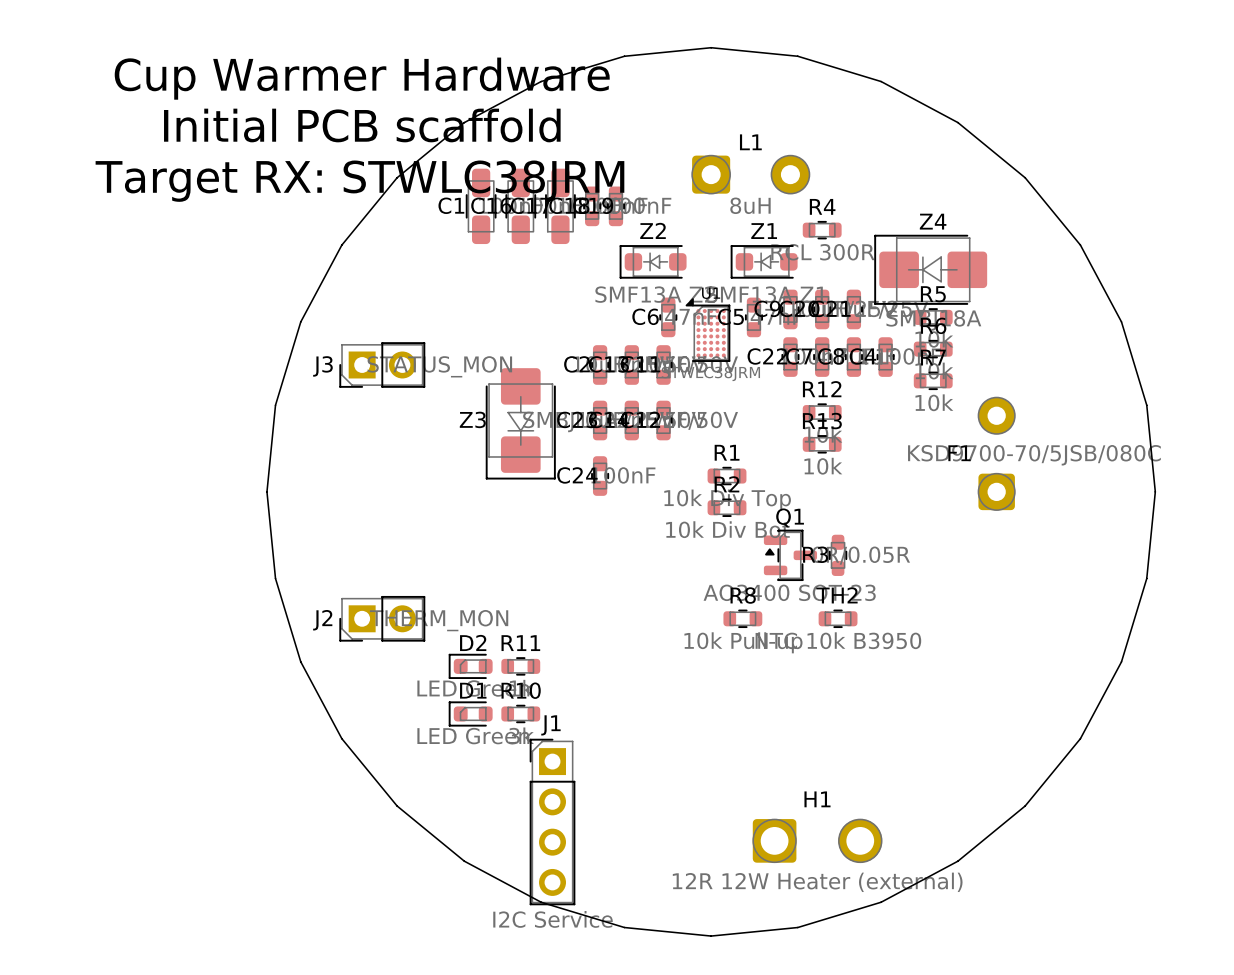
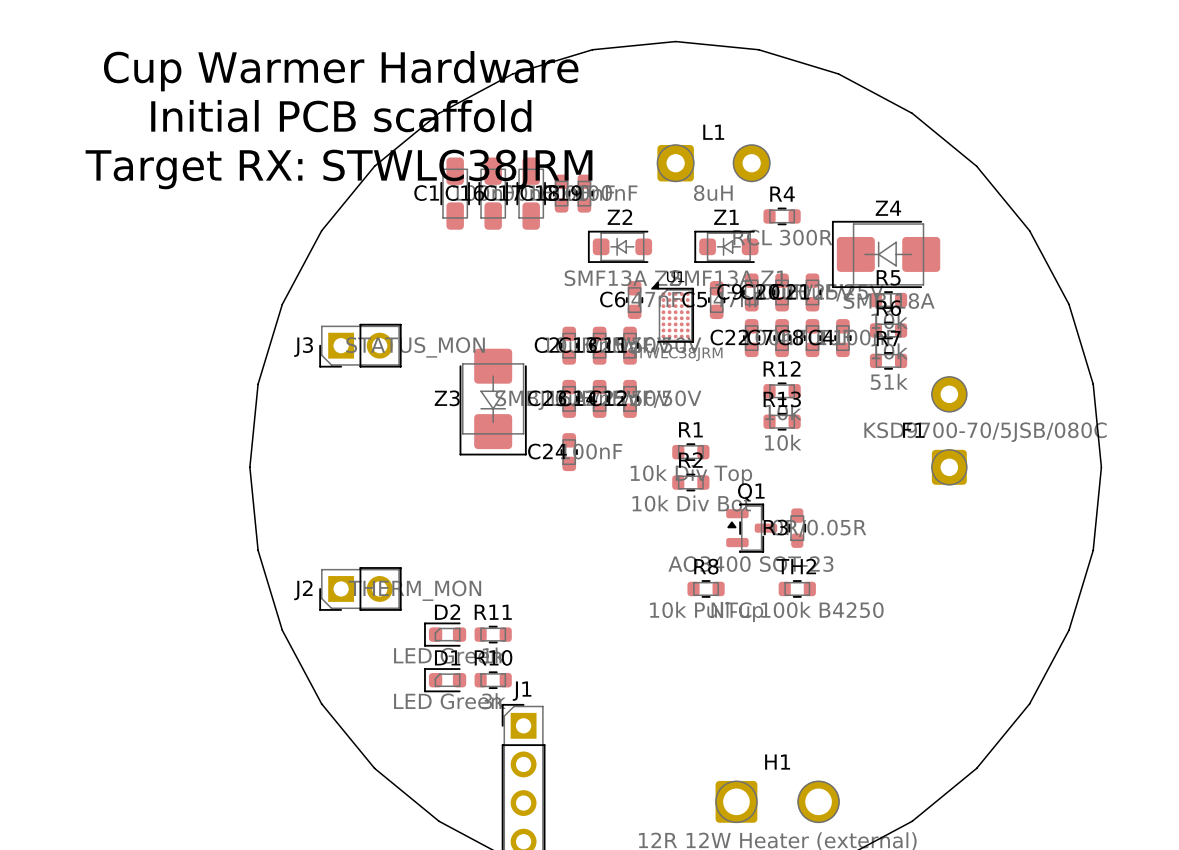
R7 value: 10k (934, 402) -> 51k (889, 381)
TH2 value: NTC 10k B3950 (838, 640) -> NTC 100k B4250 (797, 609)

